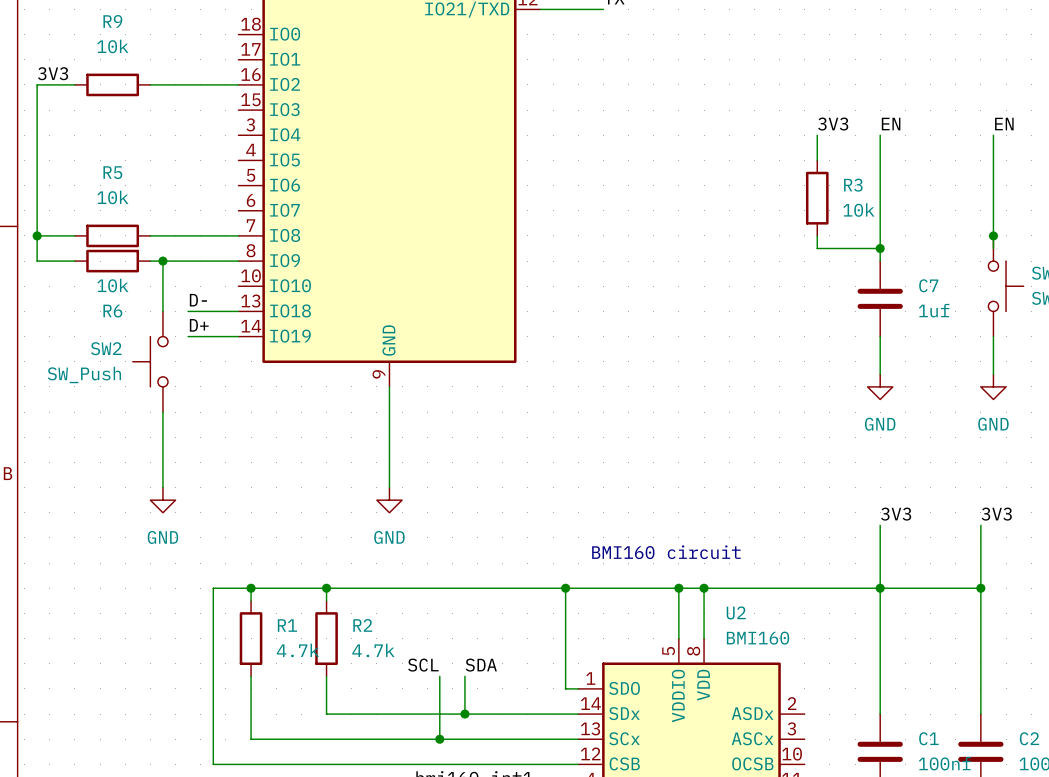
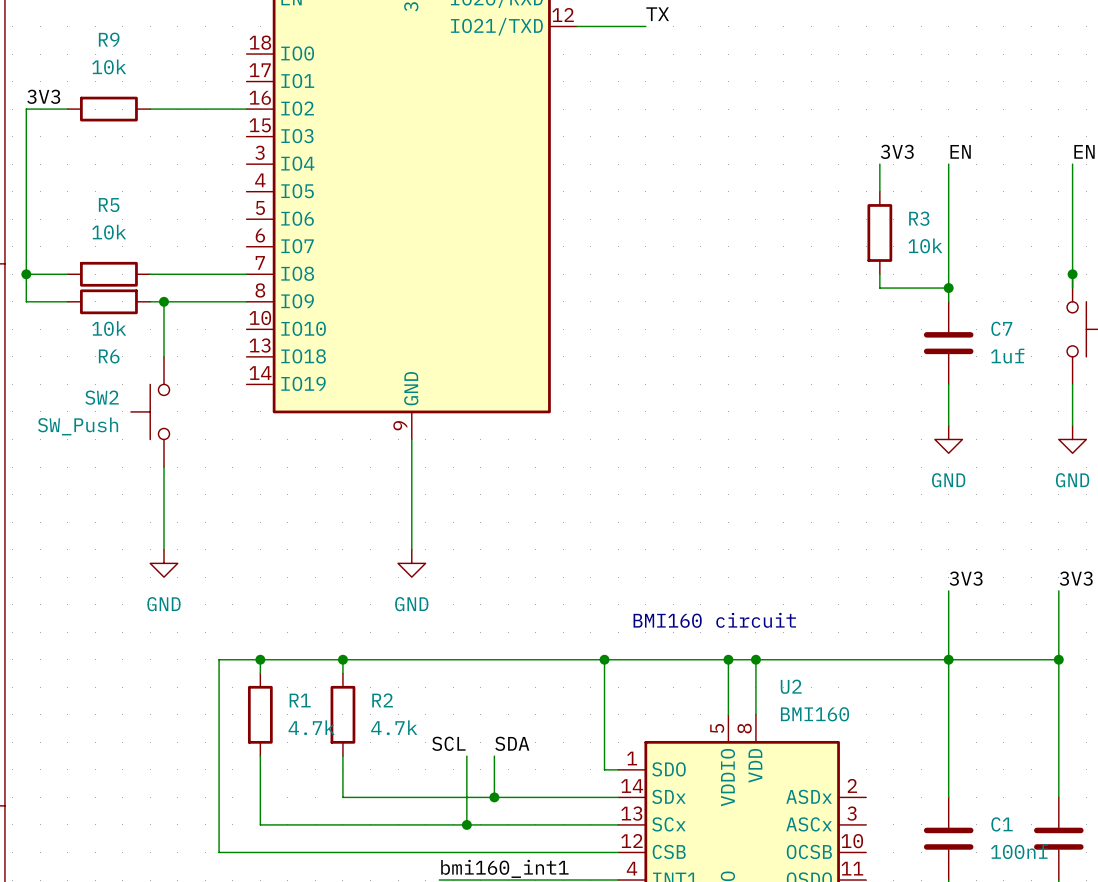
label: D- (198, 300) -> none
wire: (188, 311) (238, 311) -> none
label: D+ (199, 325) -> none
wire: (188, 336) (238, 336) -> none

